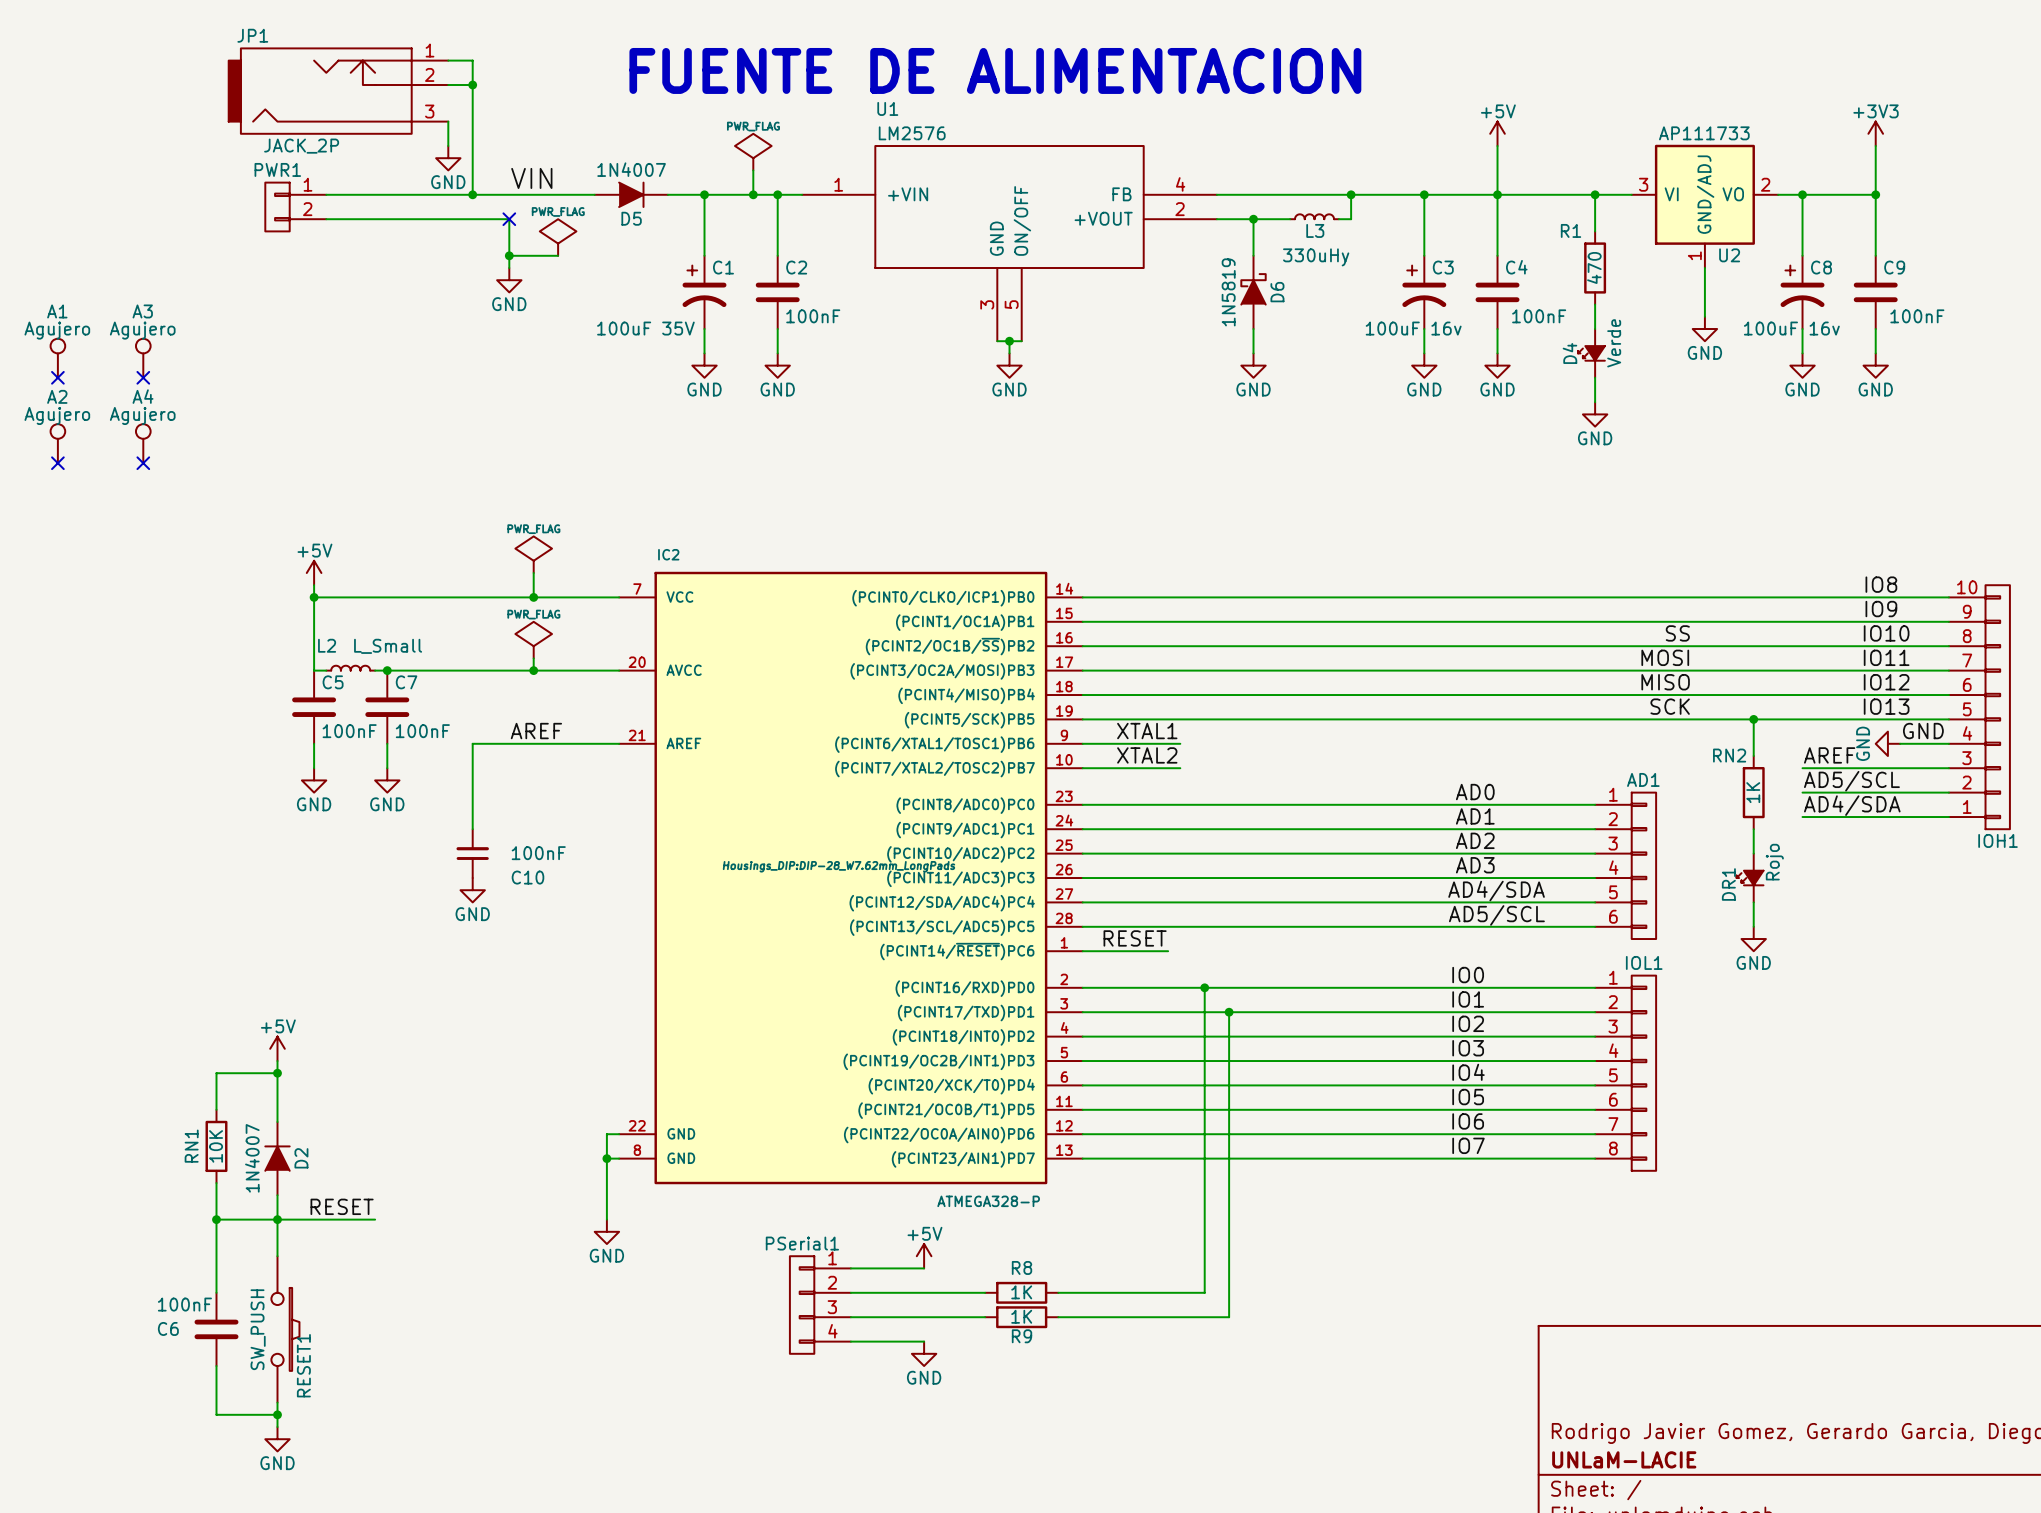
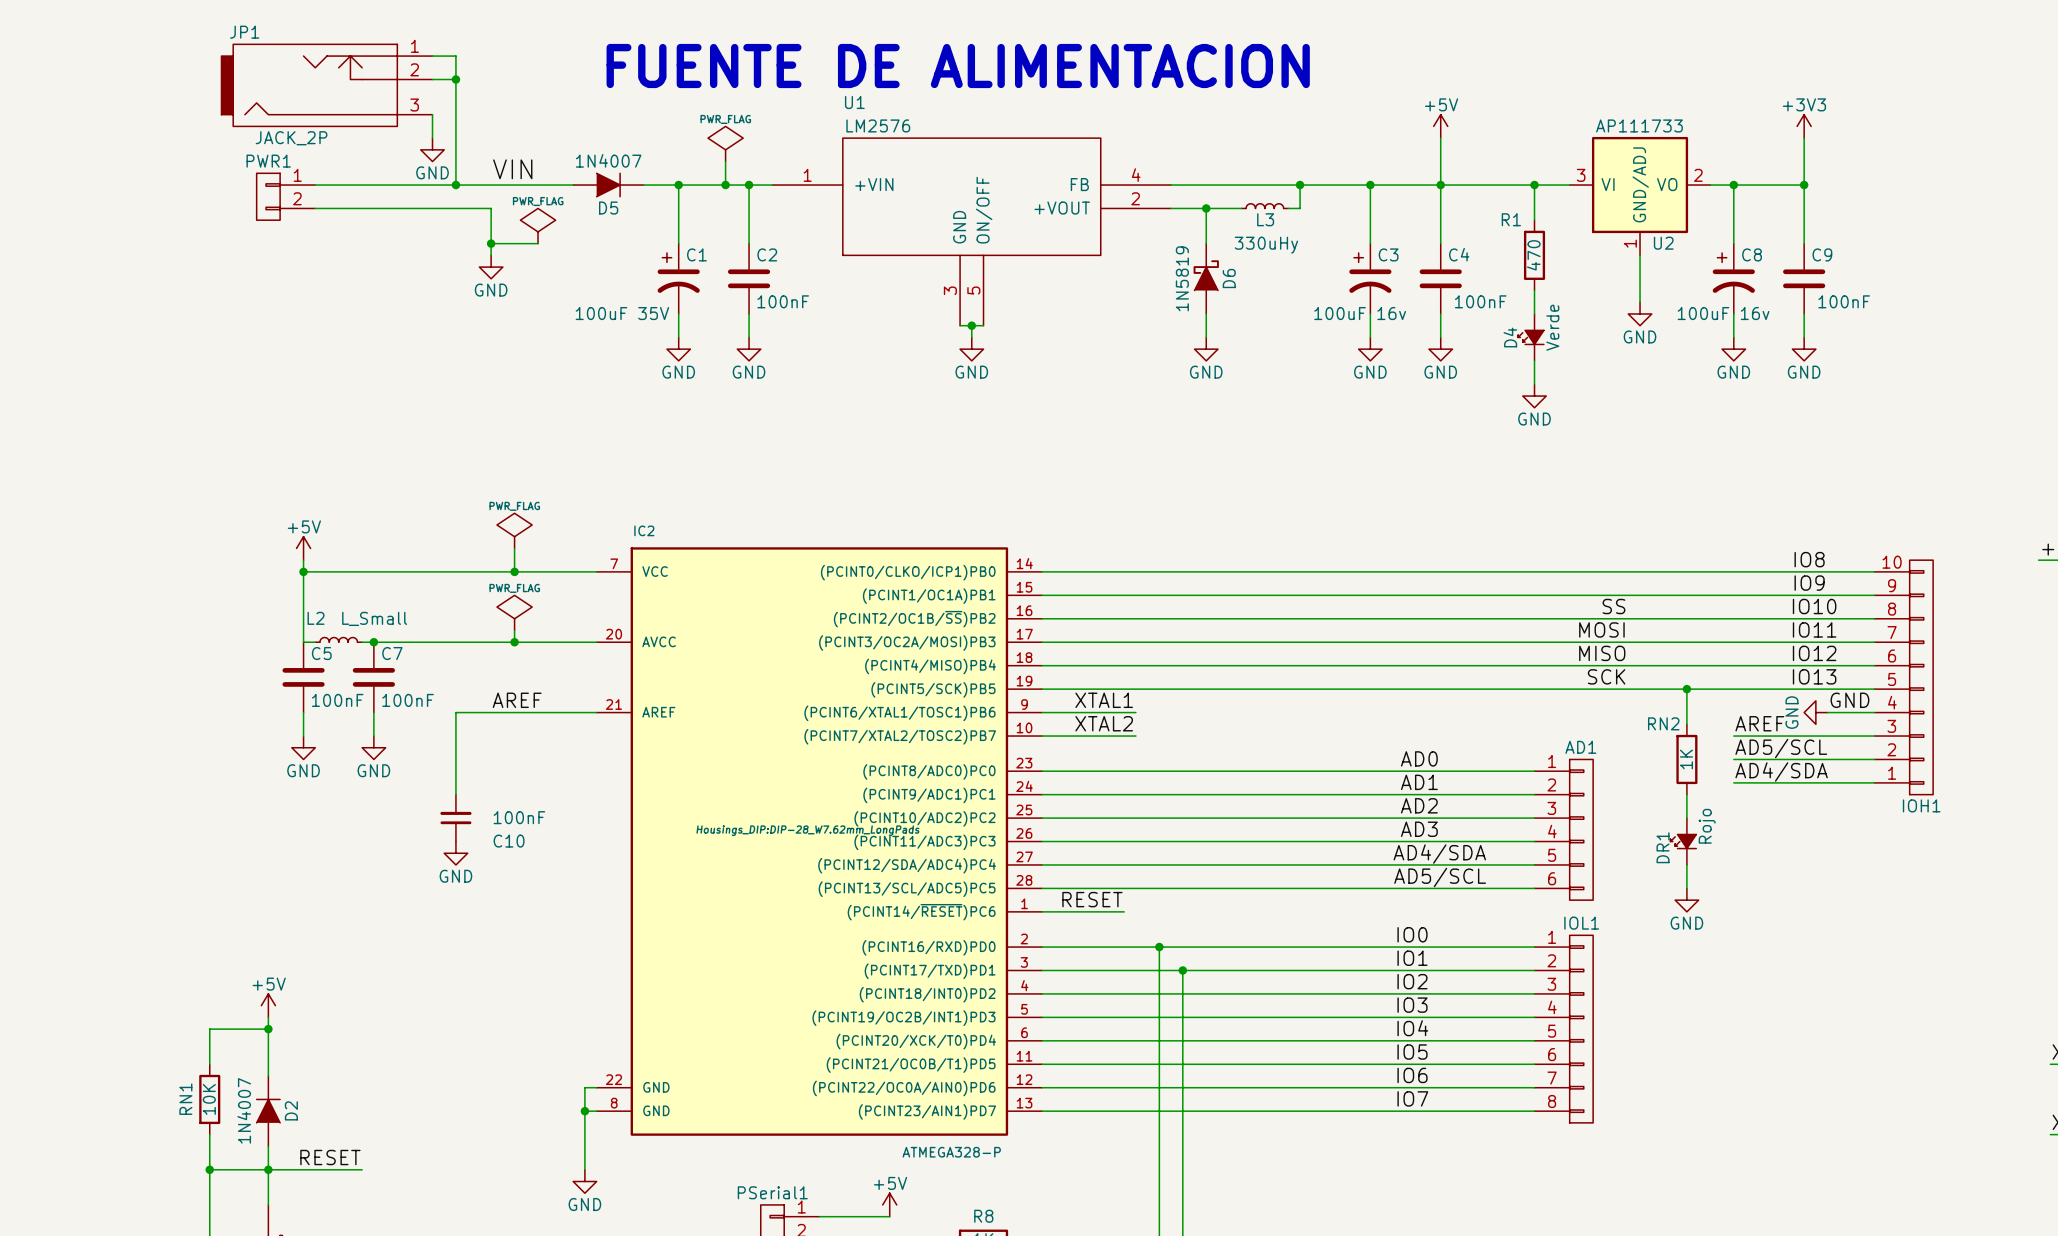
no-connect mark: (509, 219) -> none
A1: Agujero (57, 358) -> none
A3: Agujero (143, 358) -> none
no-connect mark: (57, 377) -> none
no-connect mark: (143, 377) -> none
A2: Agujero (57, 443) -> none
A4: Agujero (143, 443) -> none
no-connect mark: (57, 463) -> none
no-connect mark: (143, 463) -> none

